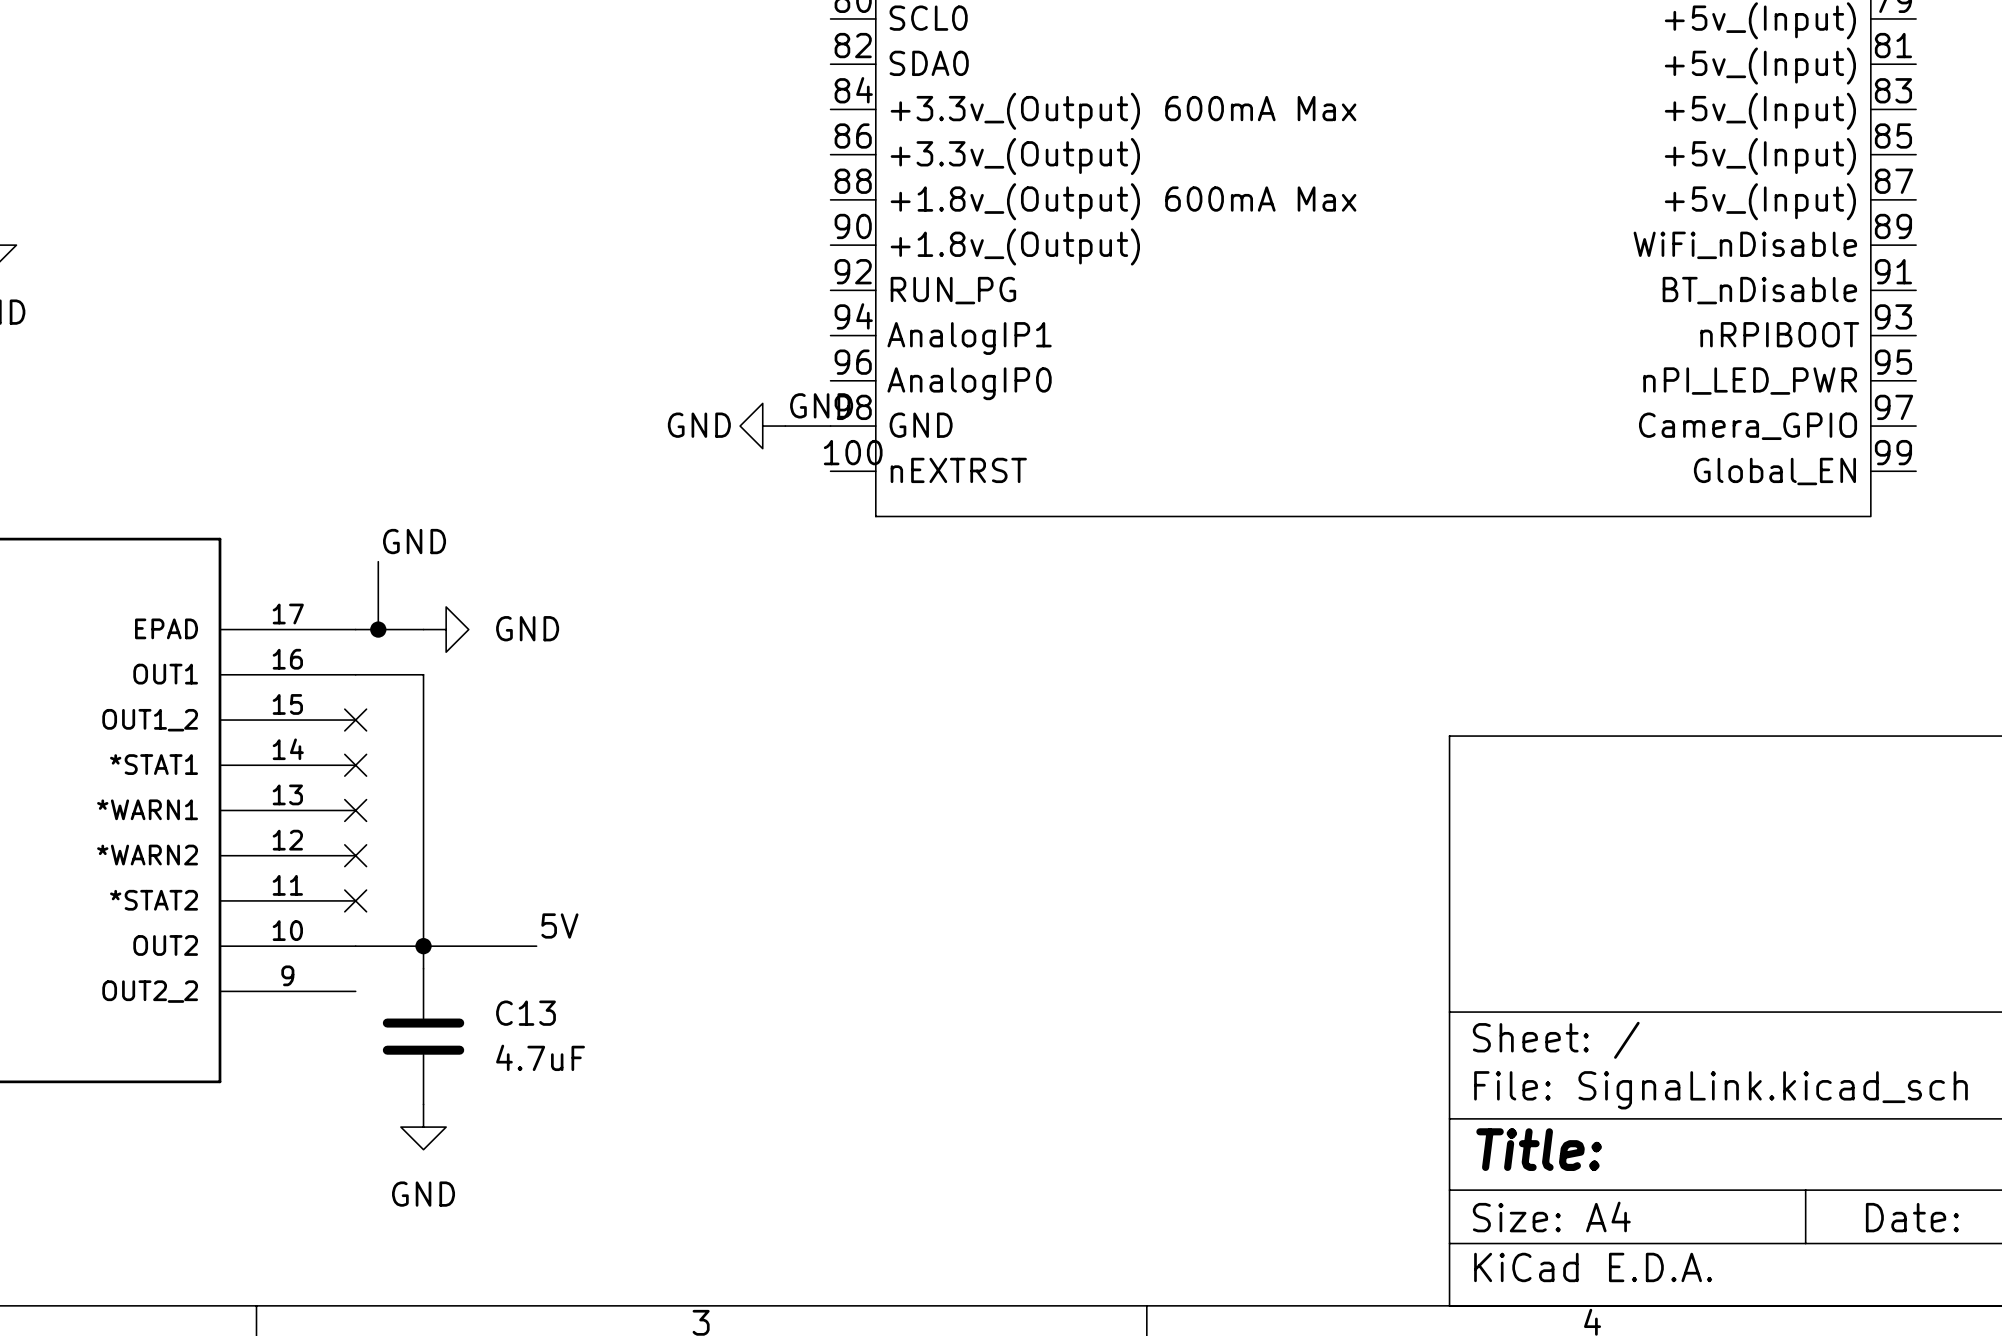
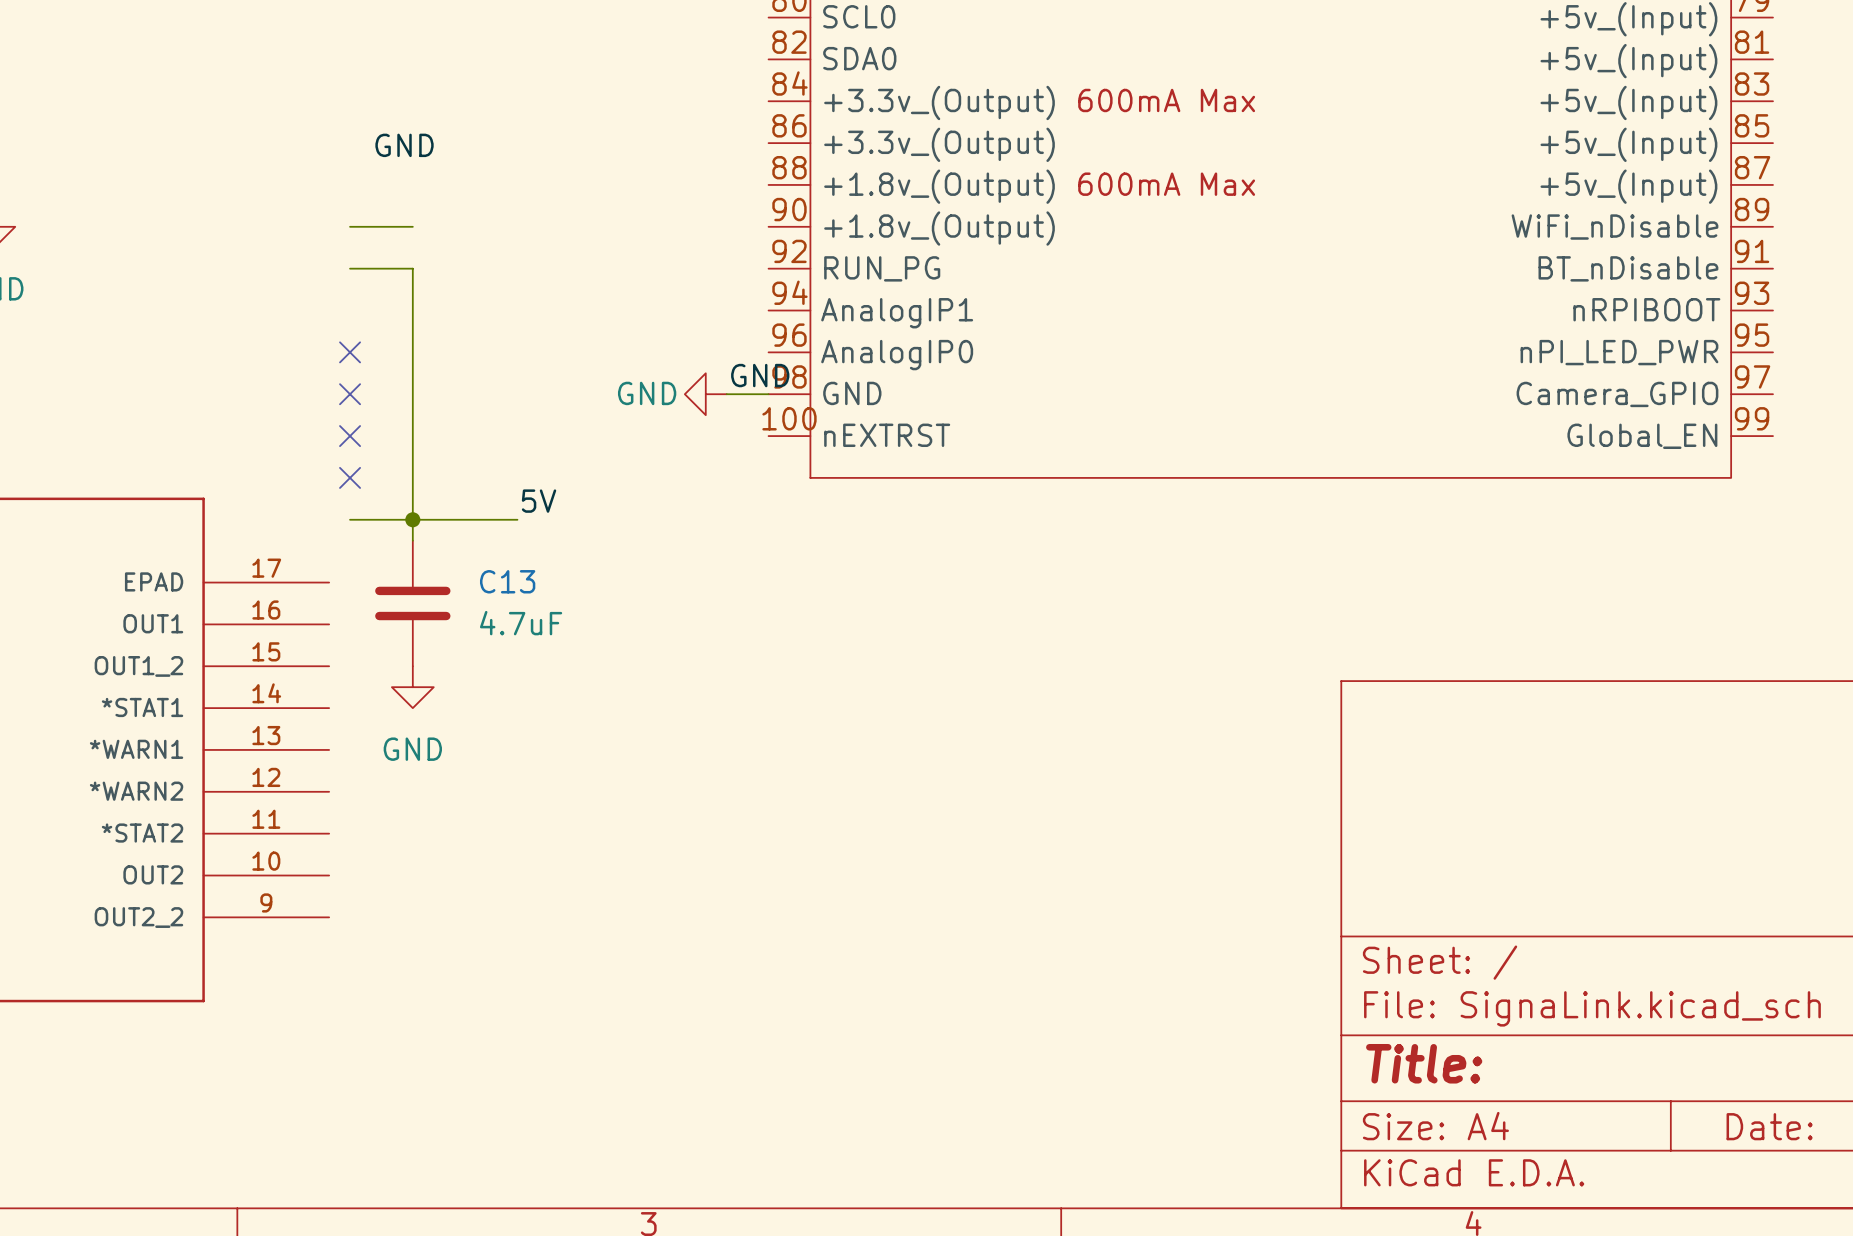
no-connect mark: none -> (350, 352)
no-connect mark: none -> (350, 394)
no-connect mark: none -> (350, 436)
no-connect mark: none -> (350, 477)
label position: GND (414, 541) -> GND (404, 145)
wire: (378, 561) (378, 629) -> (350, 519) (517, 519)
wire: (355, 629) (423, 629) -> (350, 226) (412, 226)
junction position: (378, 629) -> (412, 519)
power symbol rotation: 0° (446, 629) -> 90° clockwise (412, 687)
power symbol position: GND (446, 629) -> GND (412, 687)
wire: (355, 674) (423, 674) (423, 968) -> (350, 268) (412, 268) (412, 540)
no-connect mark: (355, 720) -> none
no-connect mark: (355, 765) -> none
no-connect mark: (355, 810) -> none
no-connect mark: (355, 855) -> none
no-connect mark: (355, 900) -> none
label position: 5V (559, 925) -> 5V (539, 501)
wire: (355, 946) (536, 946) -> none
junction: (423, 946) -> none
C13 position: (423, 1036) -> (412, 603)
power symbol: GND (423, 1127) -> none

